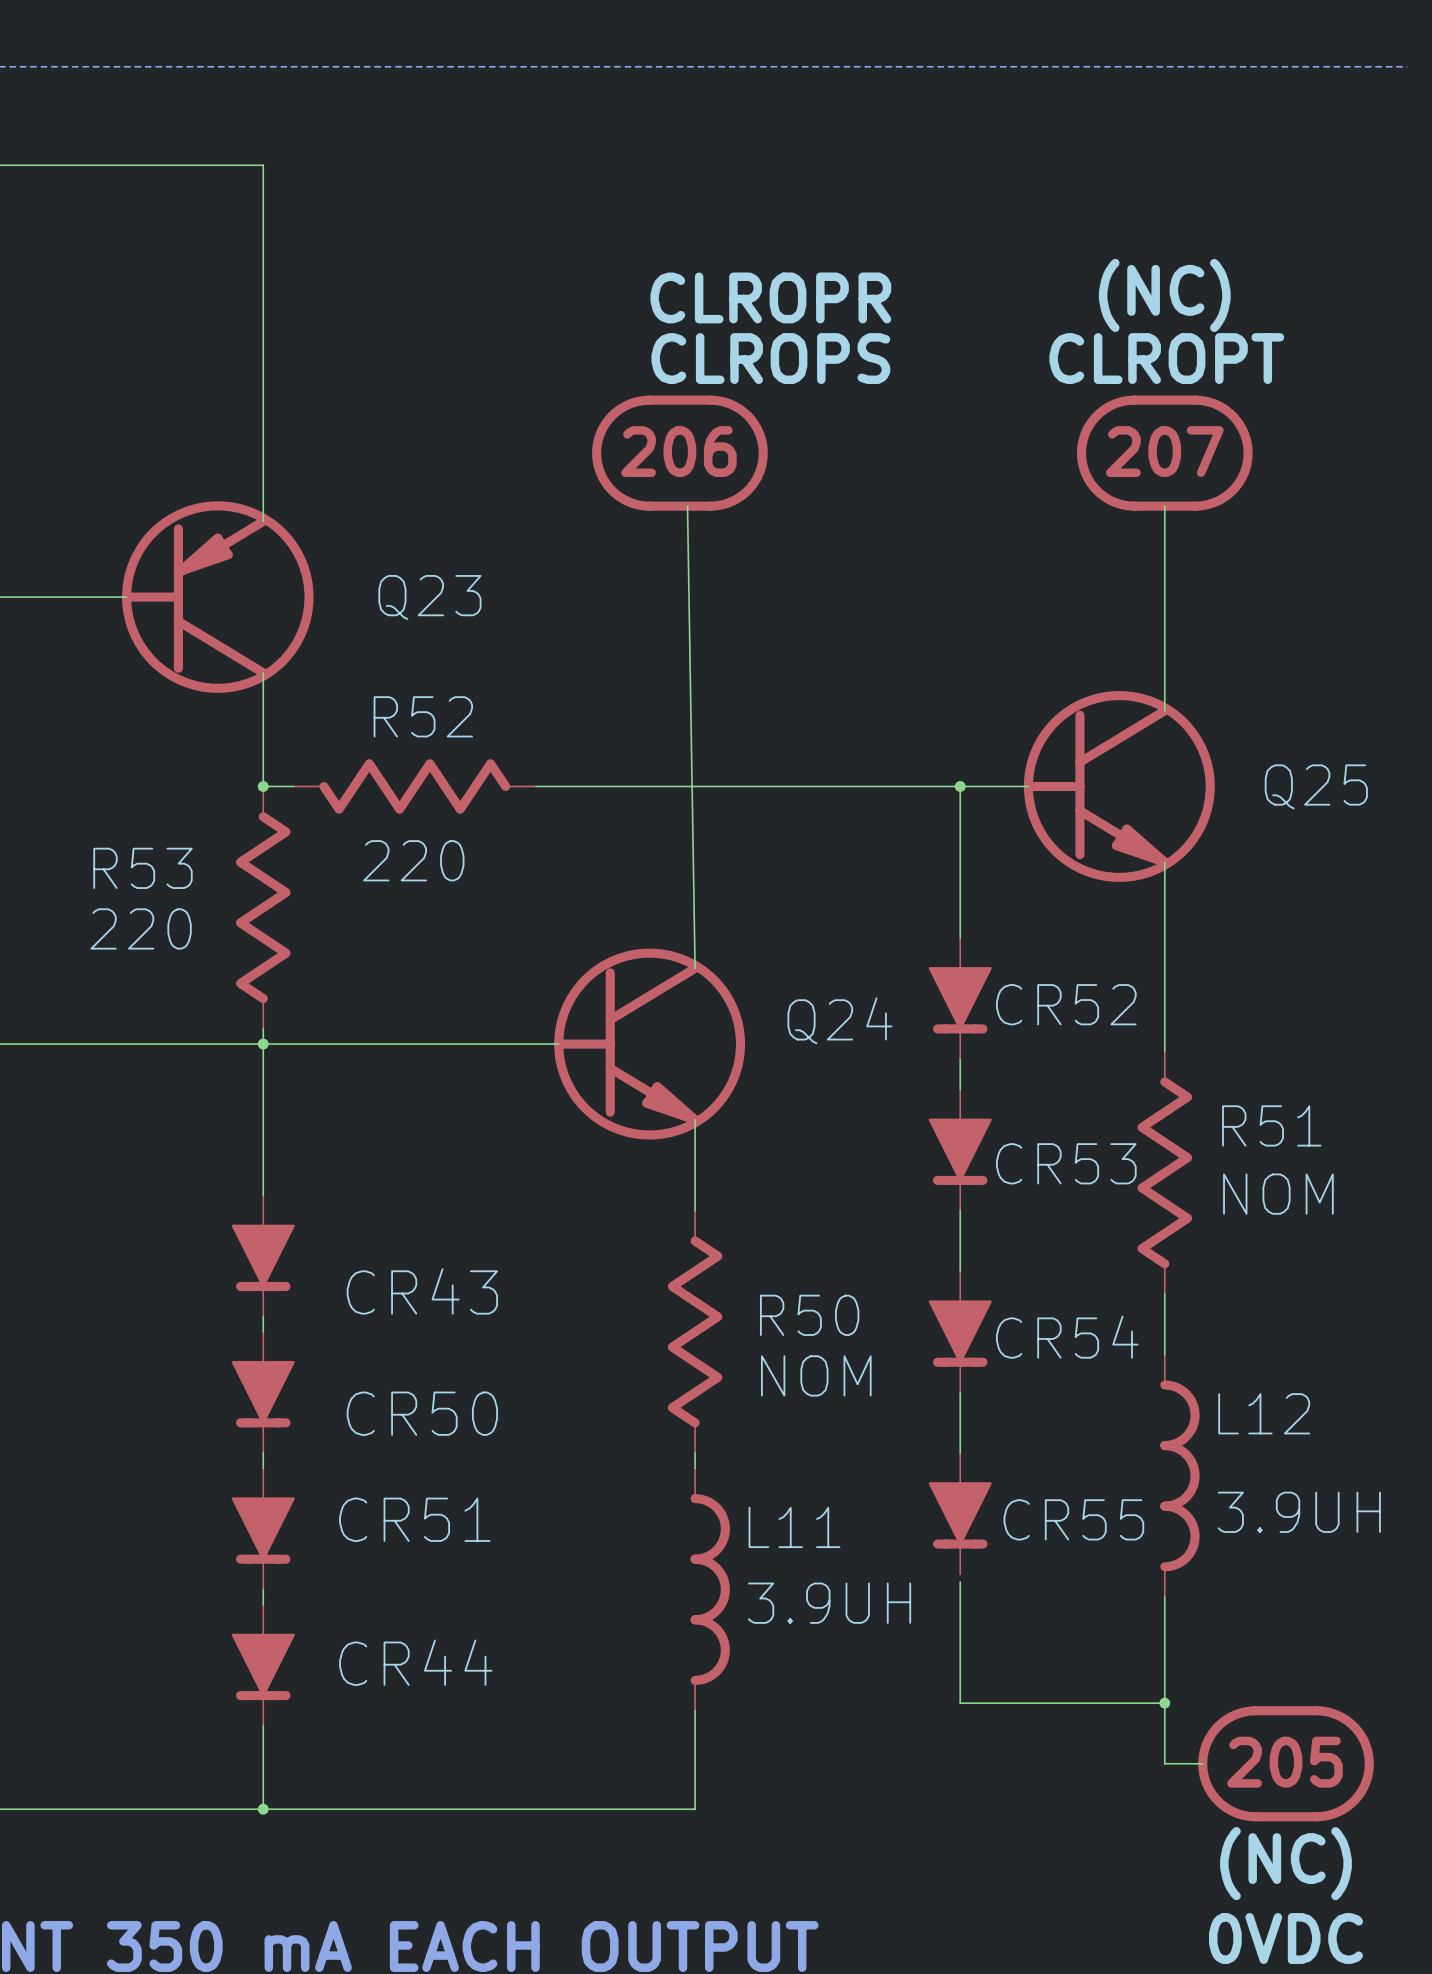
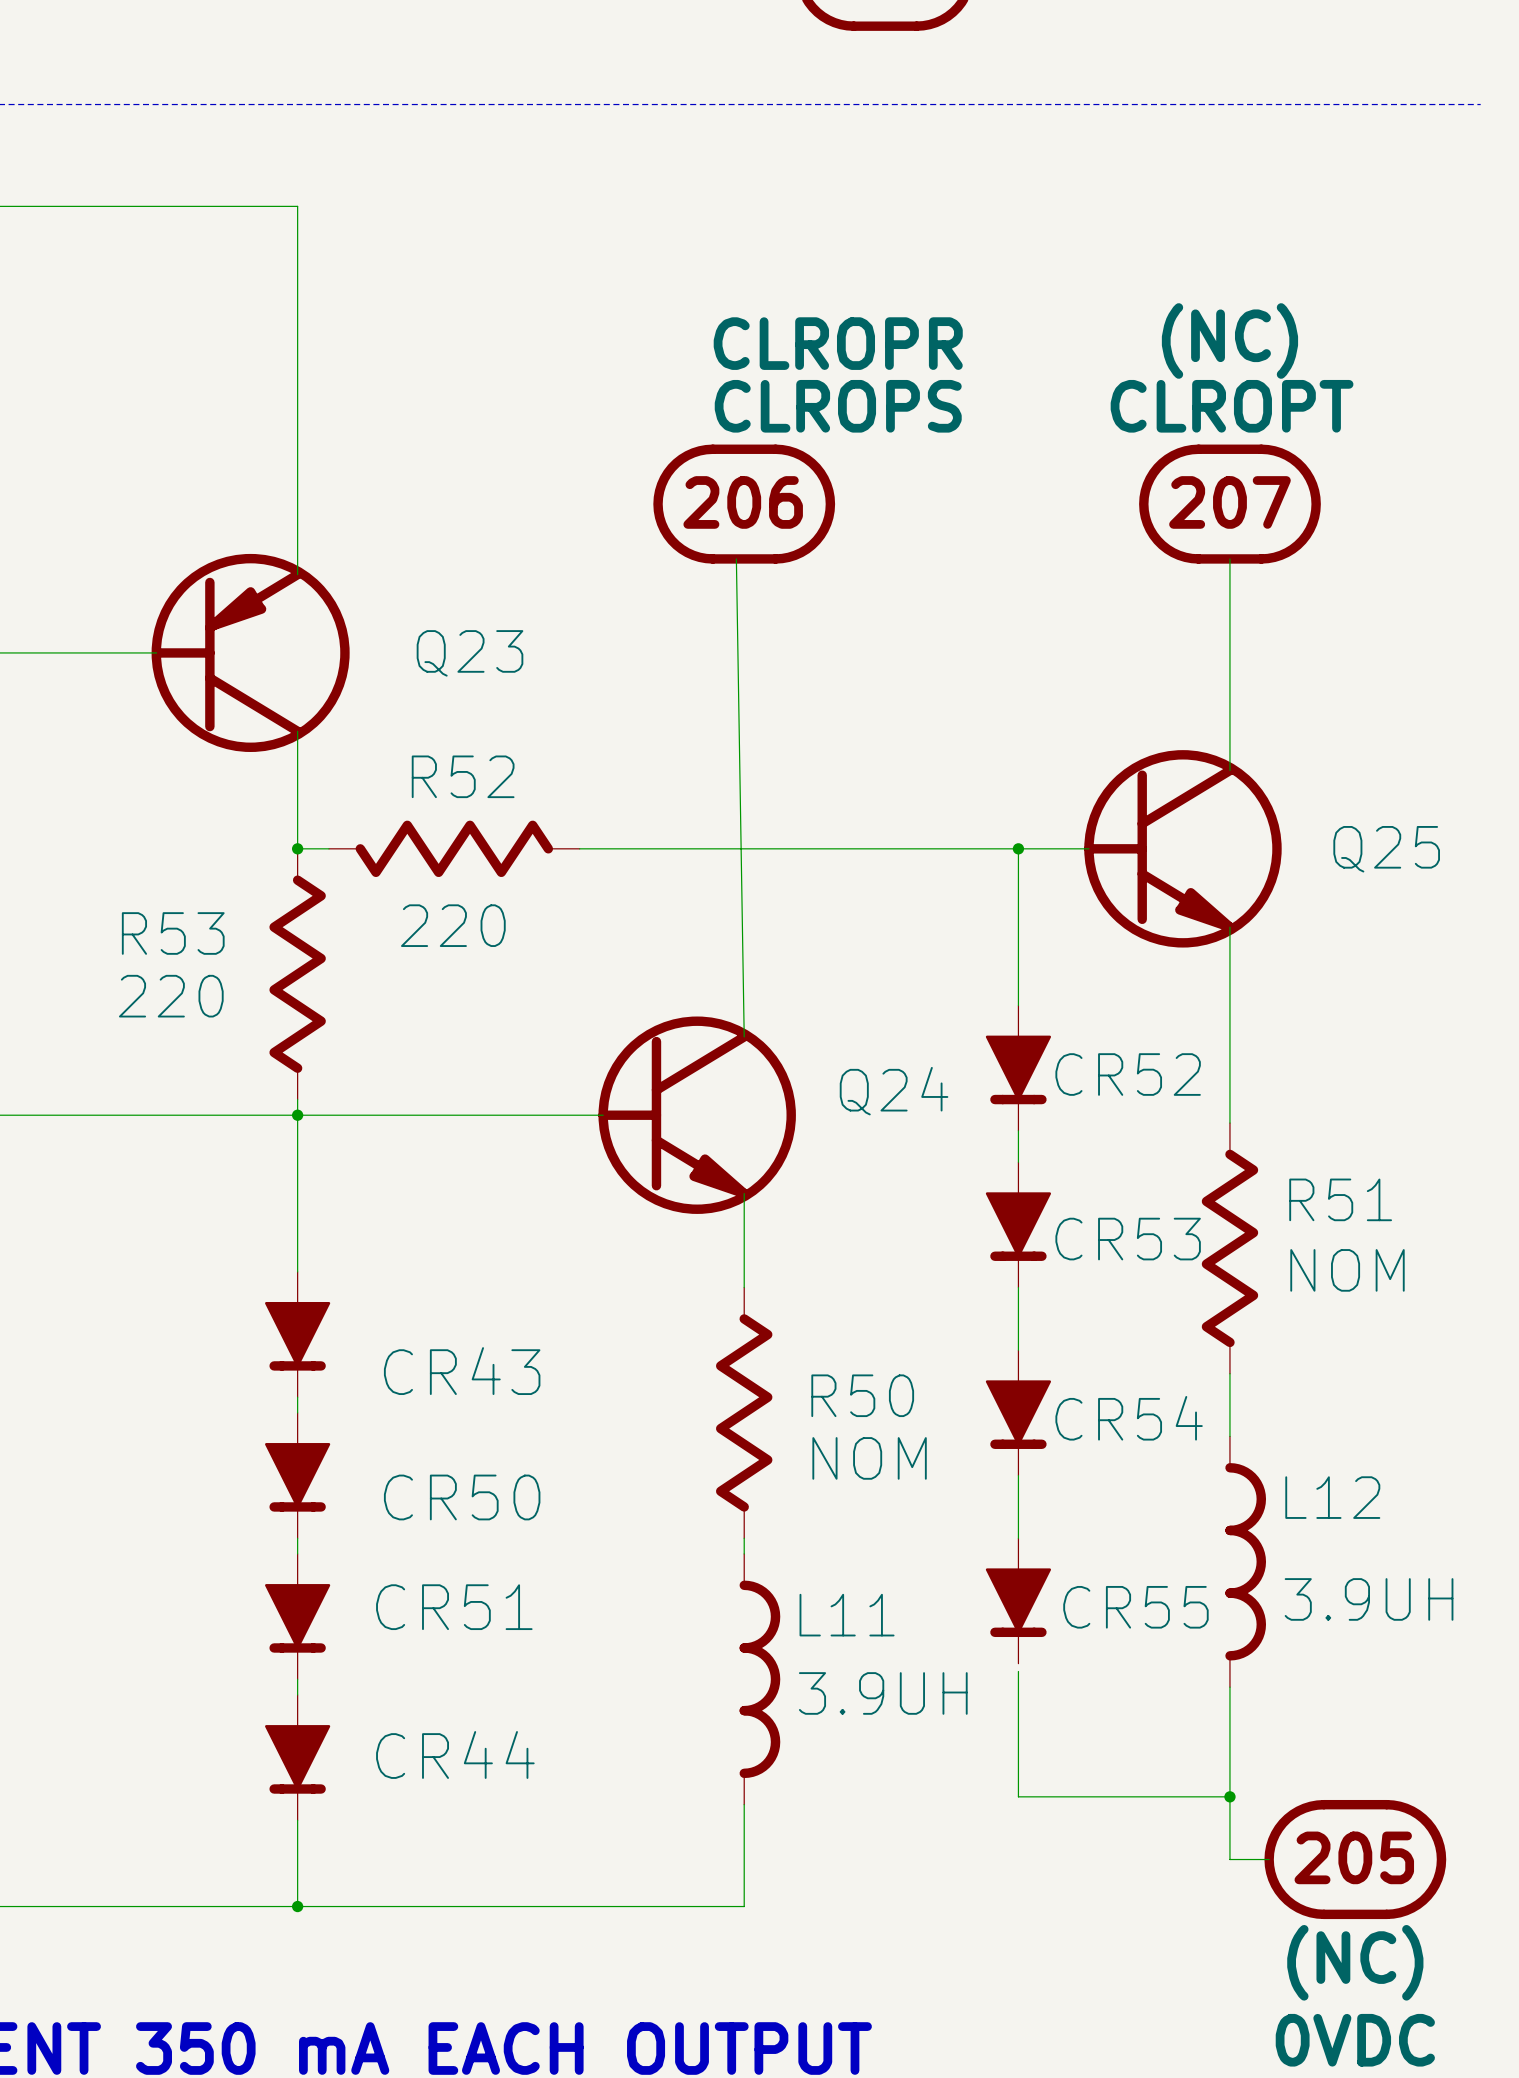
part position: (679, 453) -> (744, 504)

